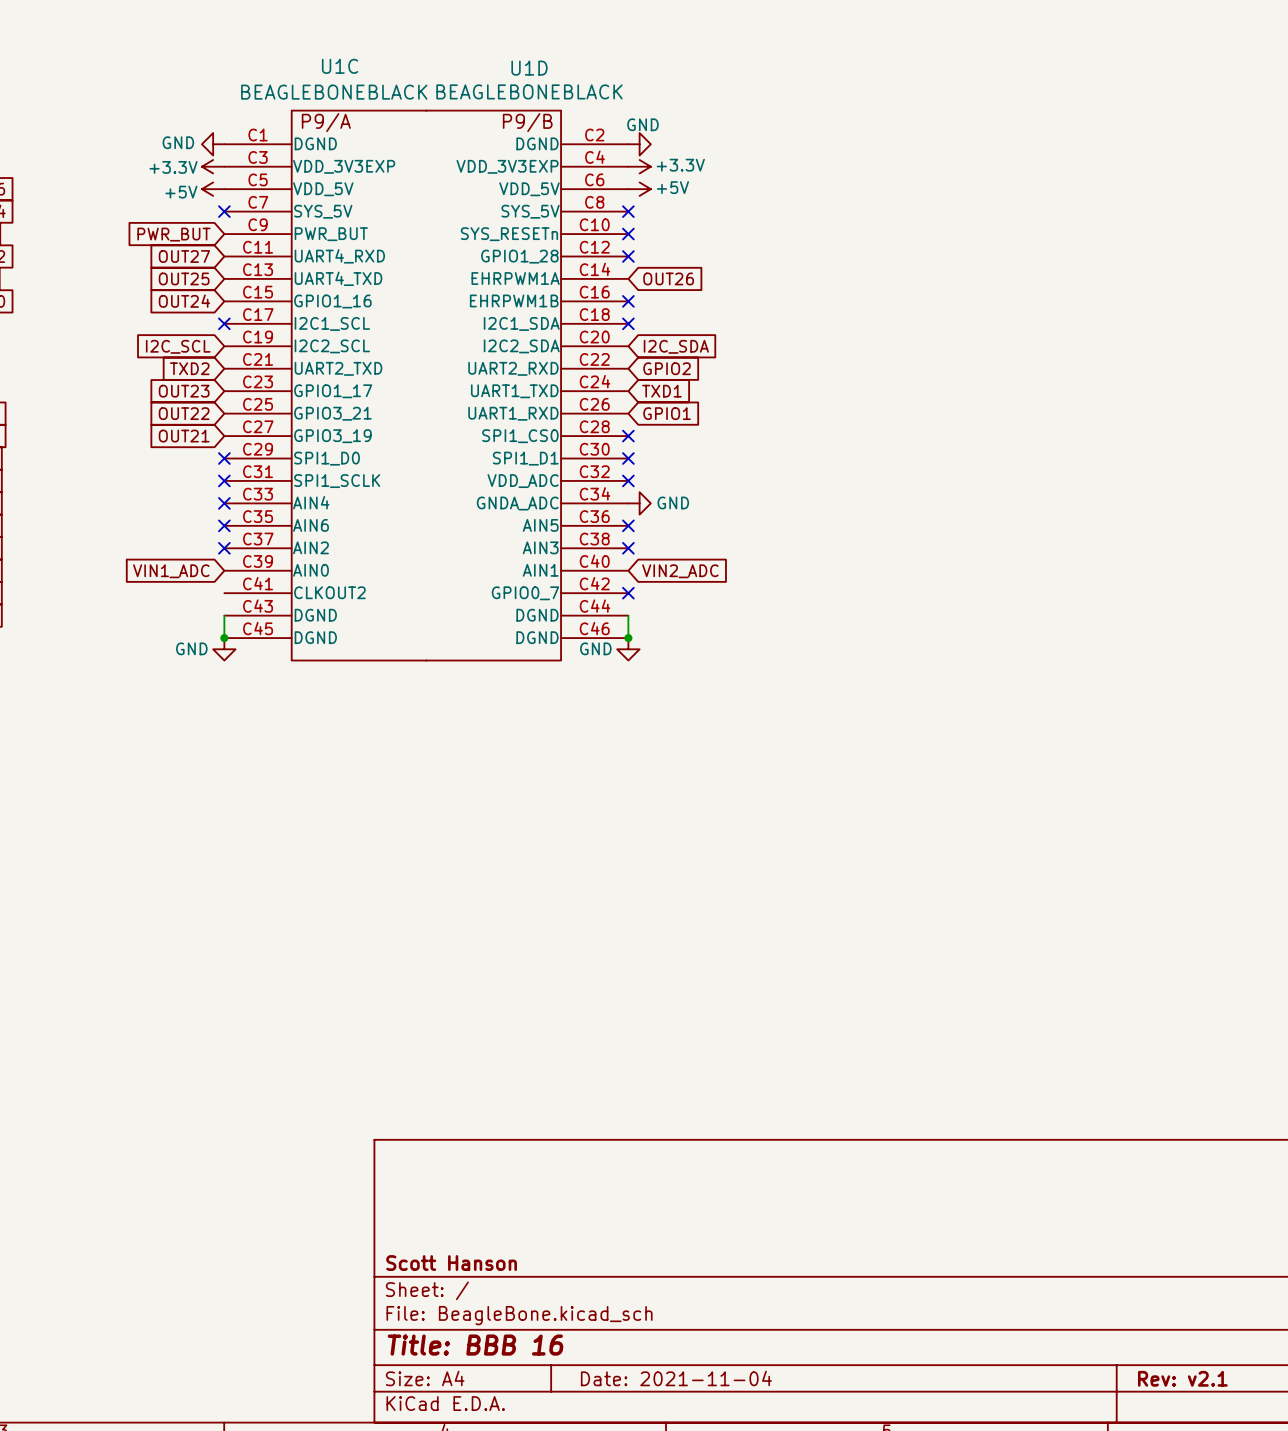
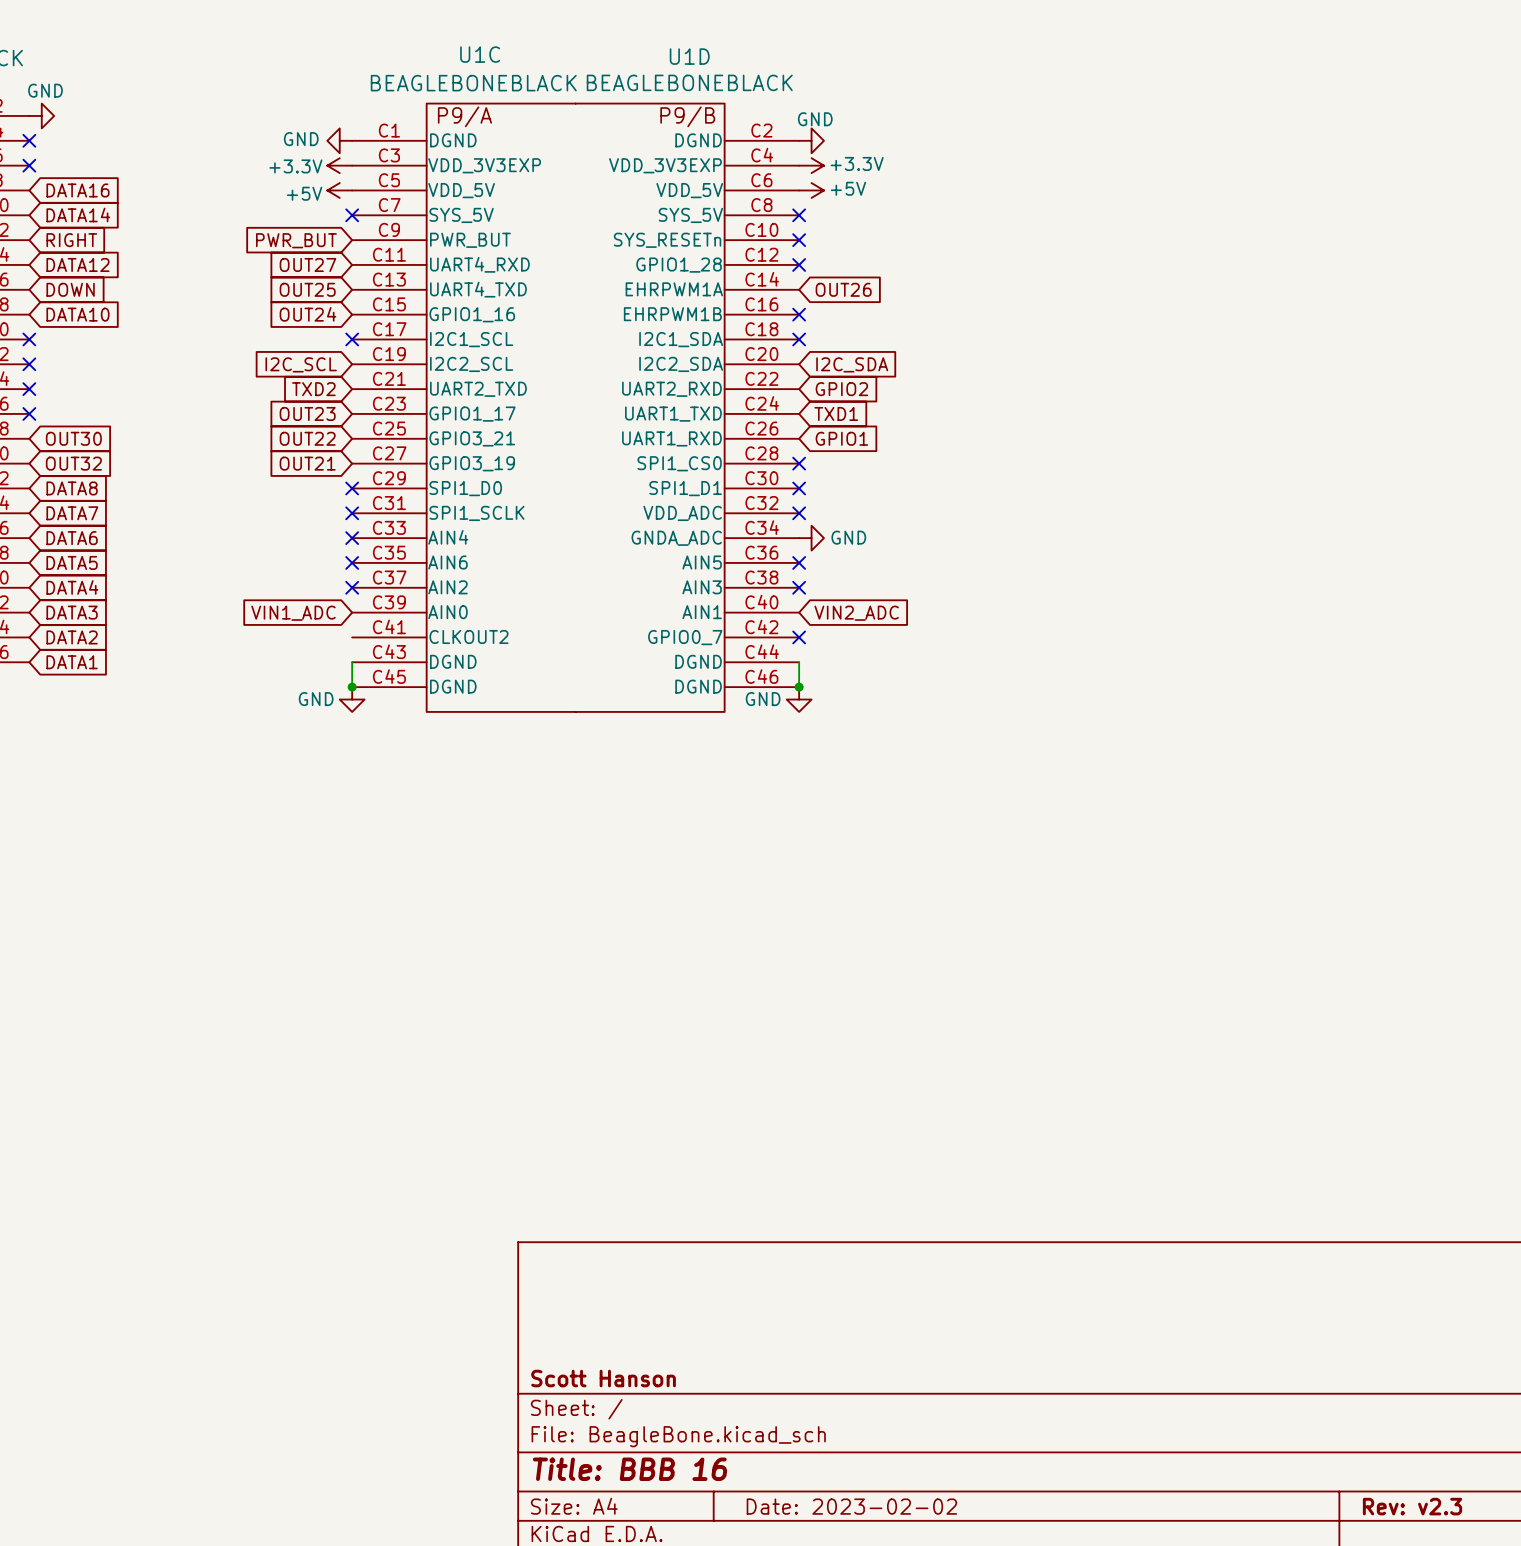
title block: Date: 2021-11-04 (676, 1378) -> Date: 2023-02-02 (851, 1506)
title block: Rev: v2.1 (1182, 1378) -> Rev: v2.3 (1412, 1506)

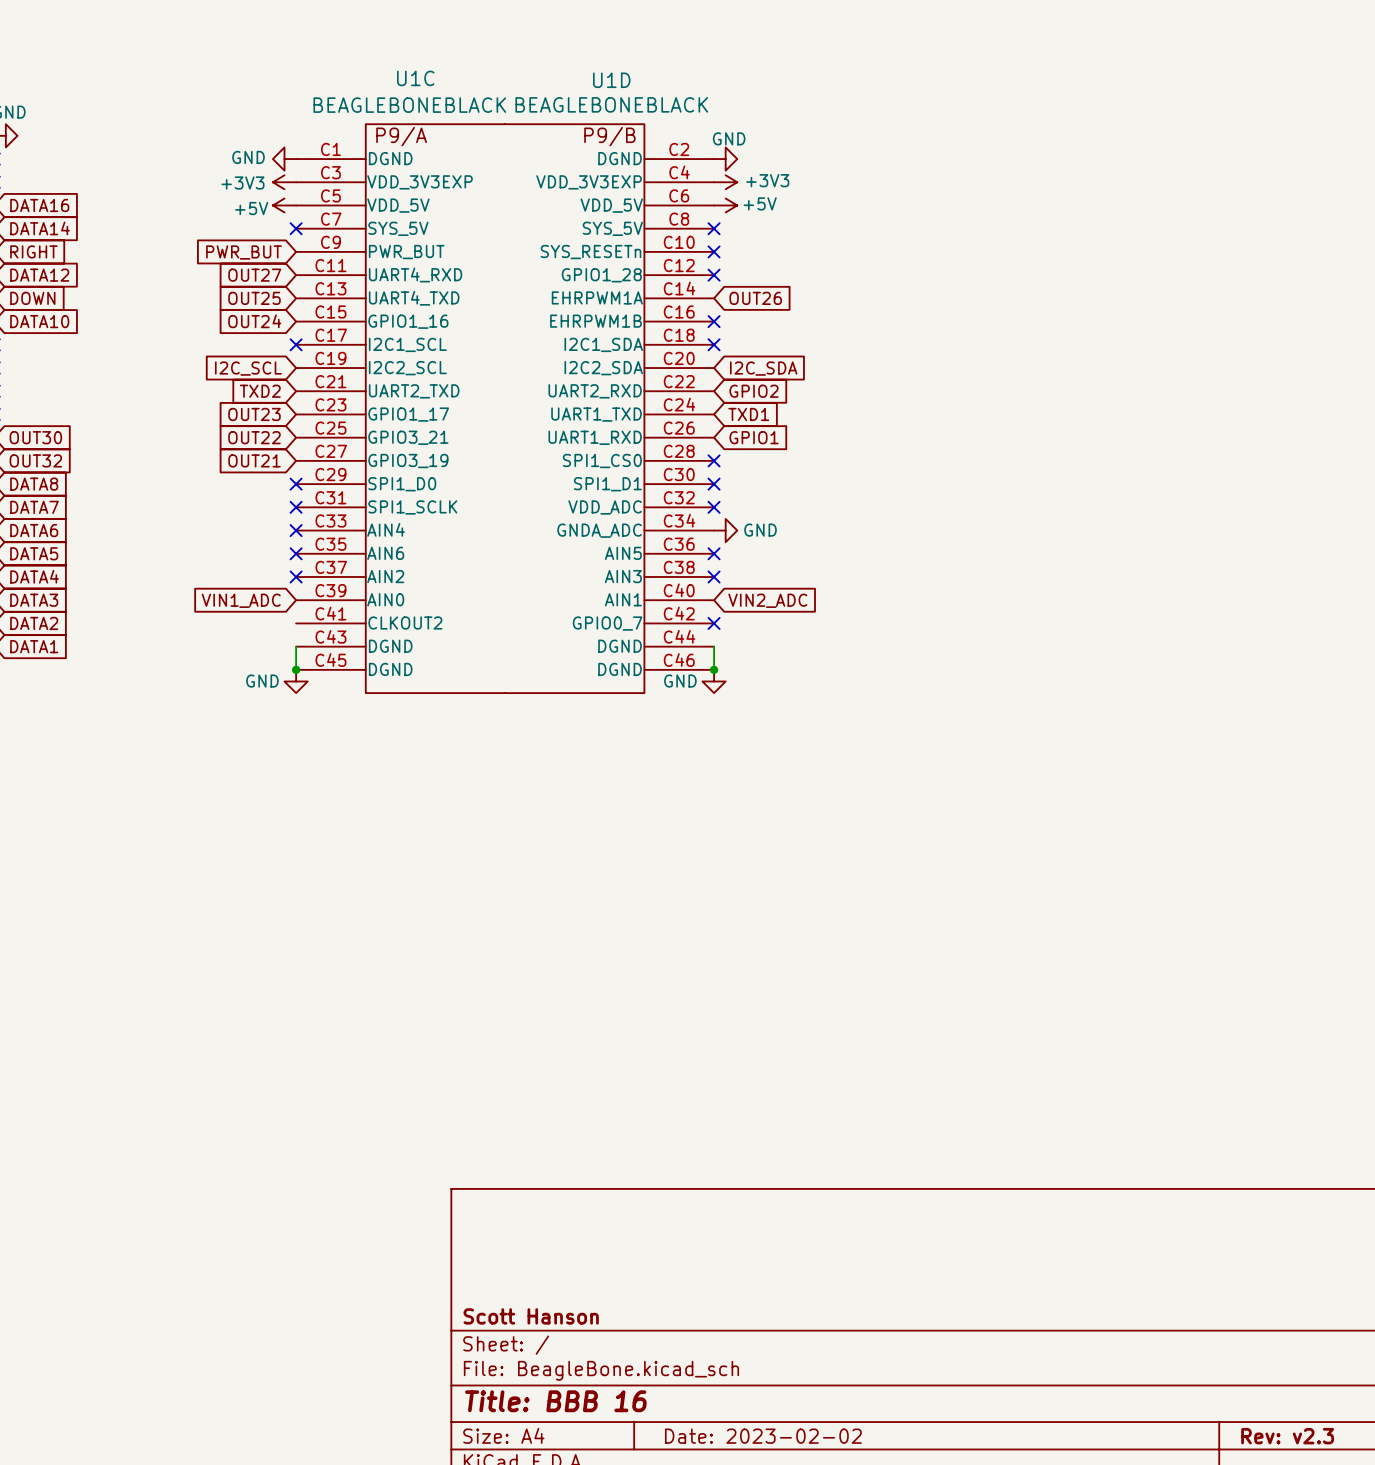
power symbol: +3.3V (339, 165) -> +3V3 (284, 182)
power symbol: +3.3V (811, 165) -> +3V3 (725, 182)

